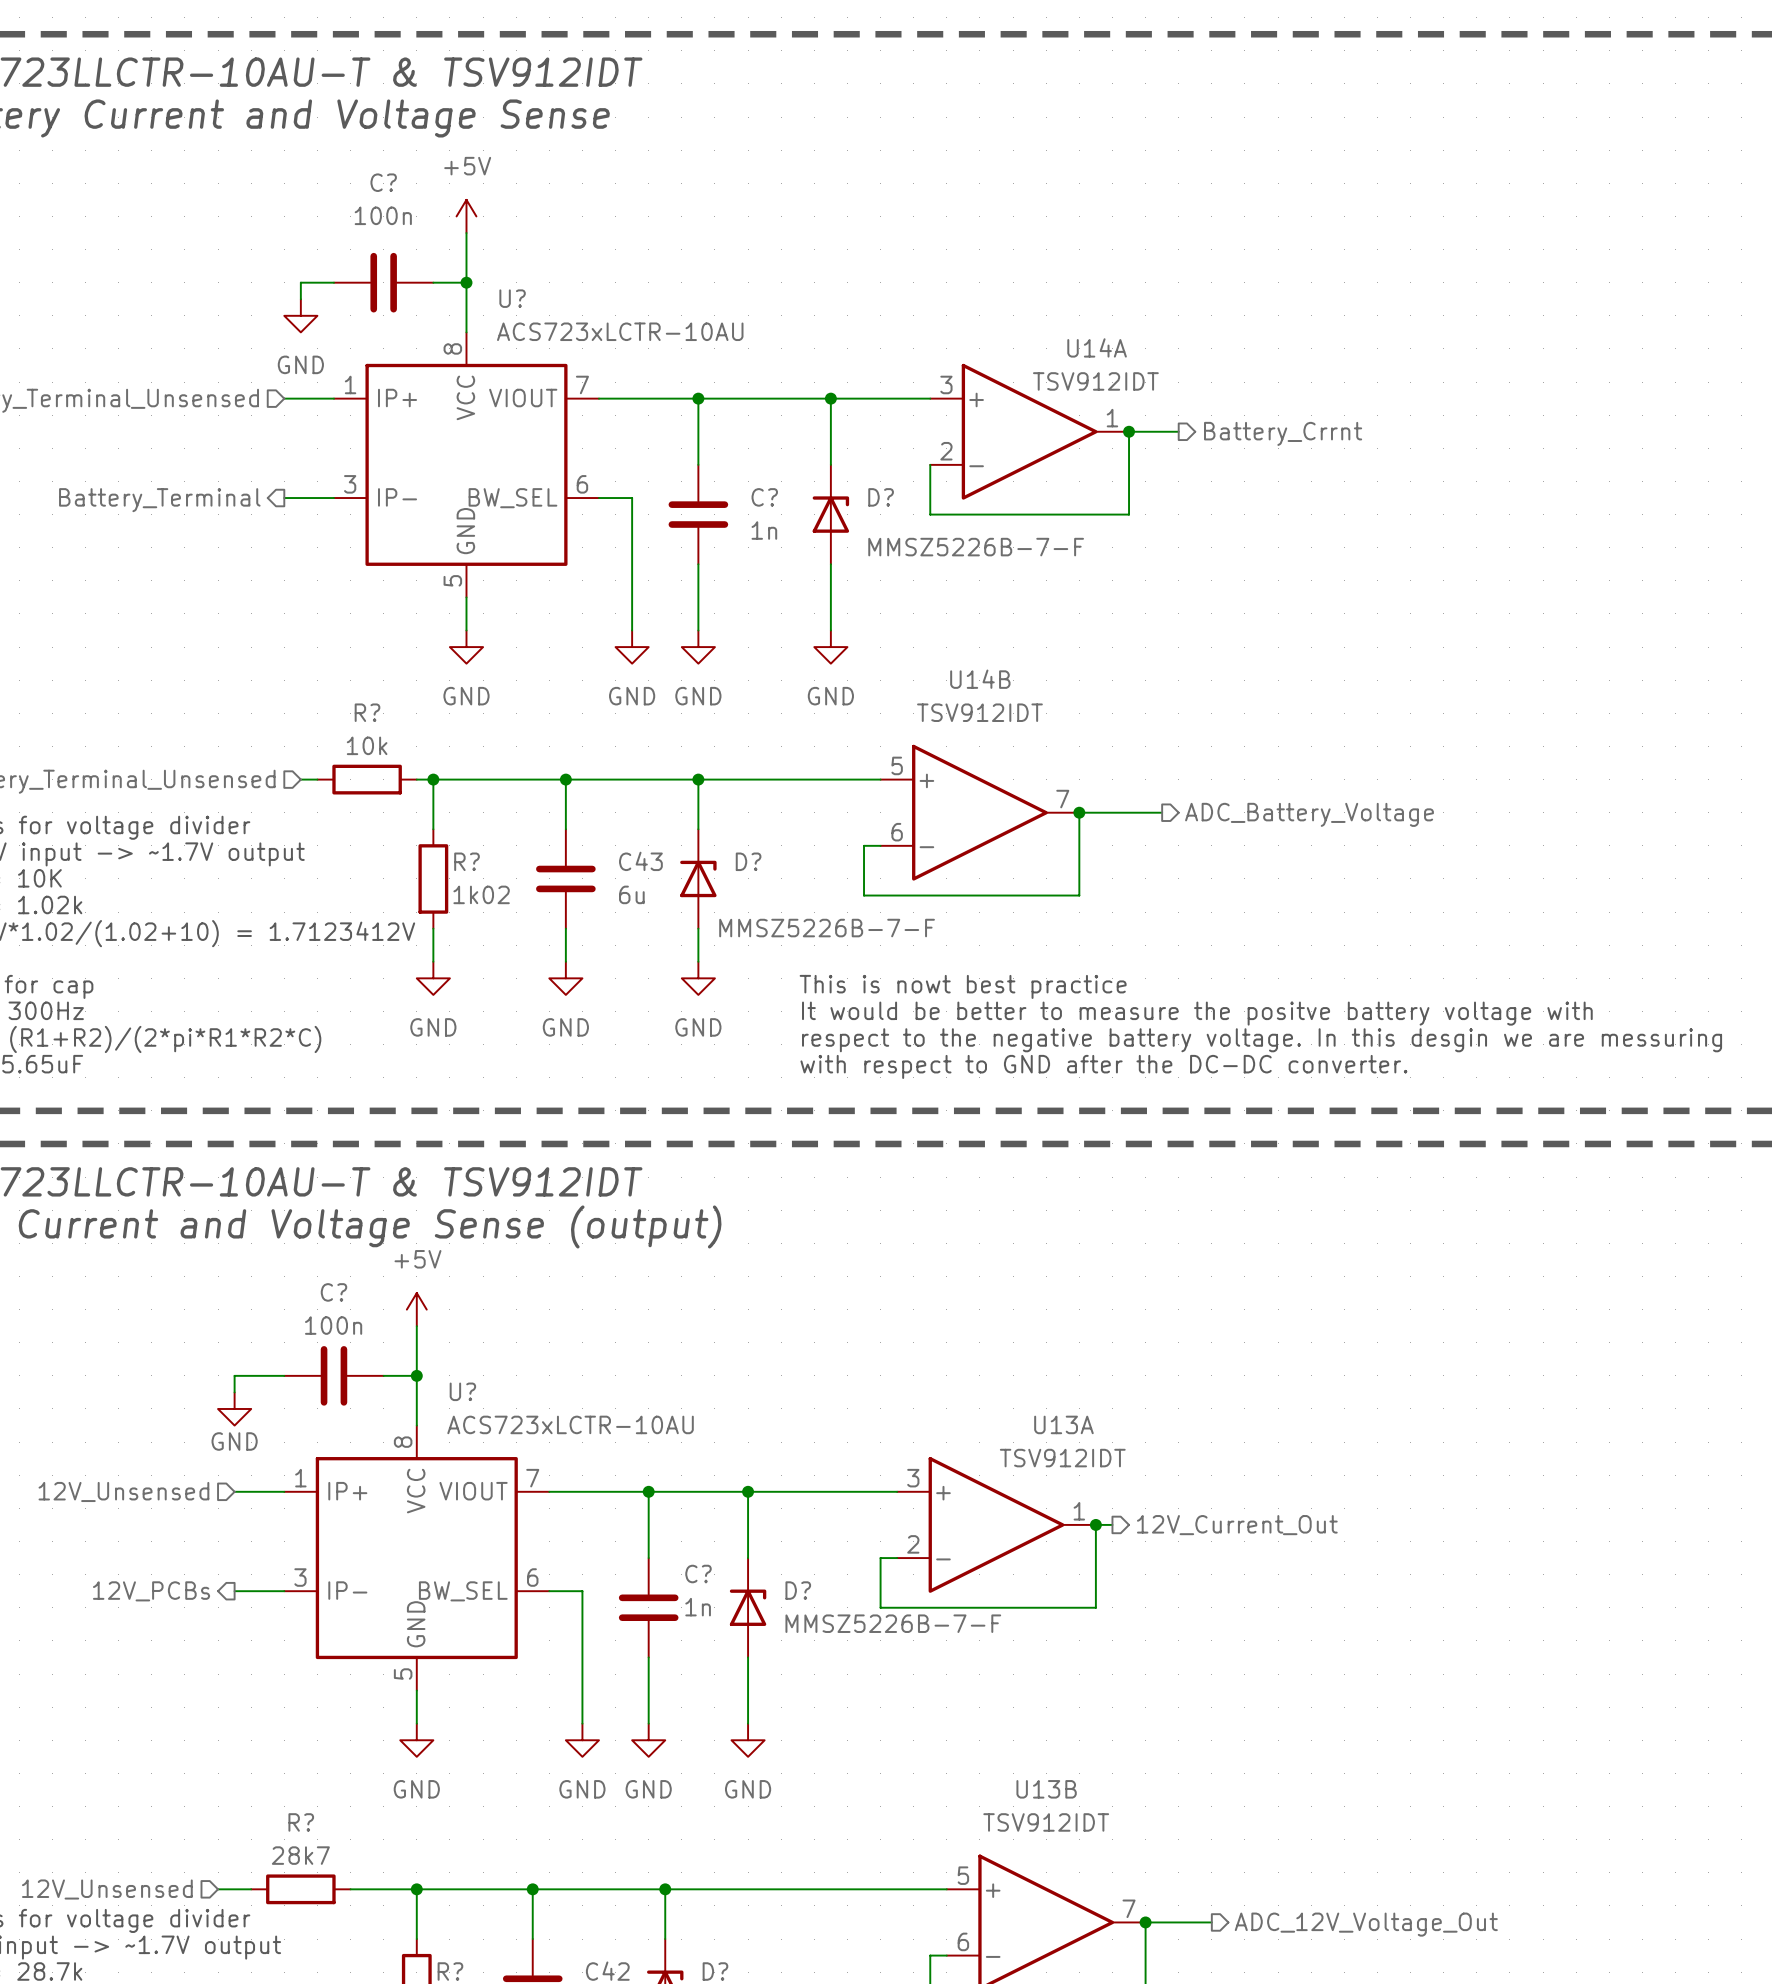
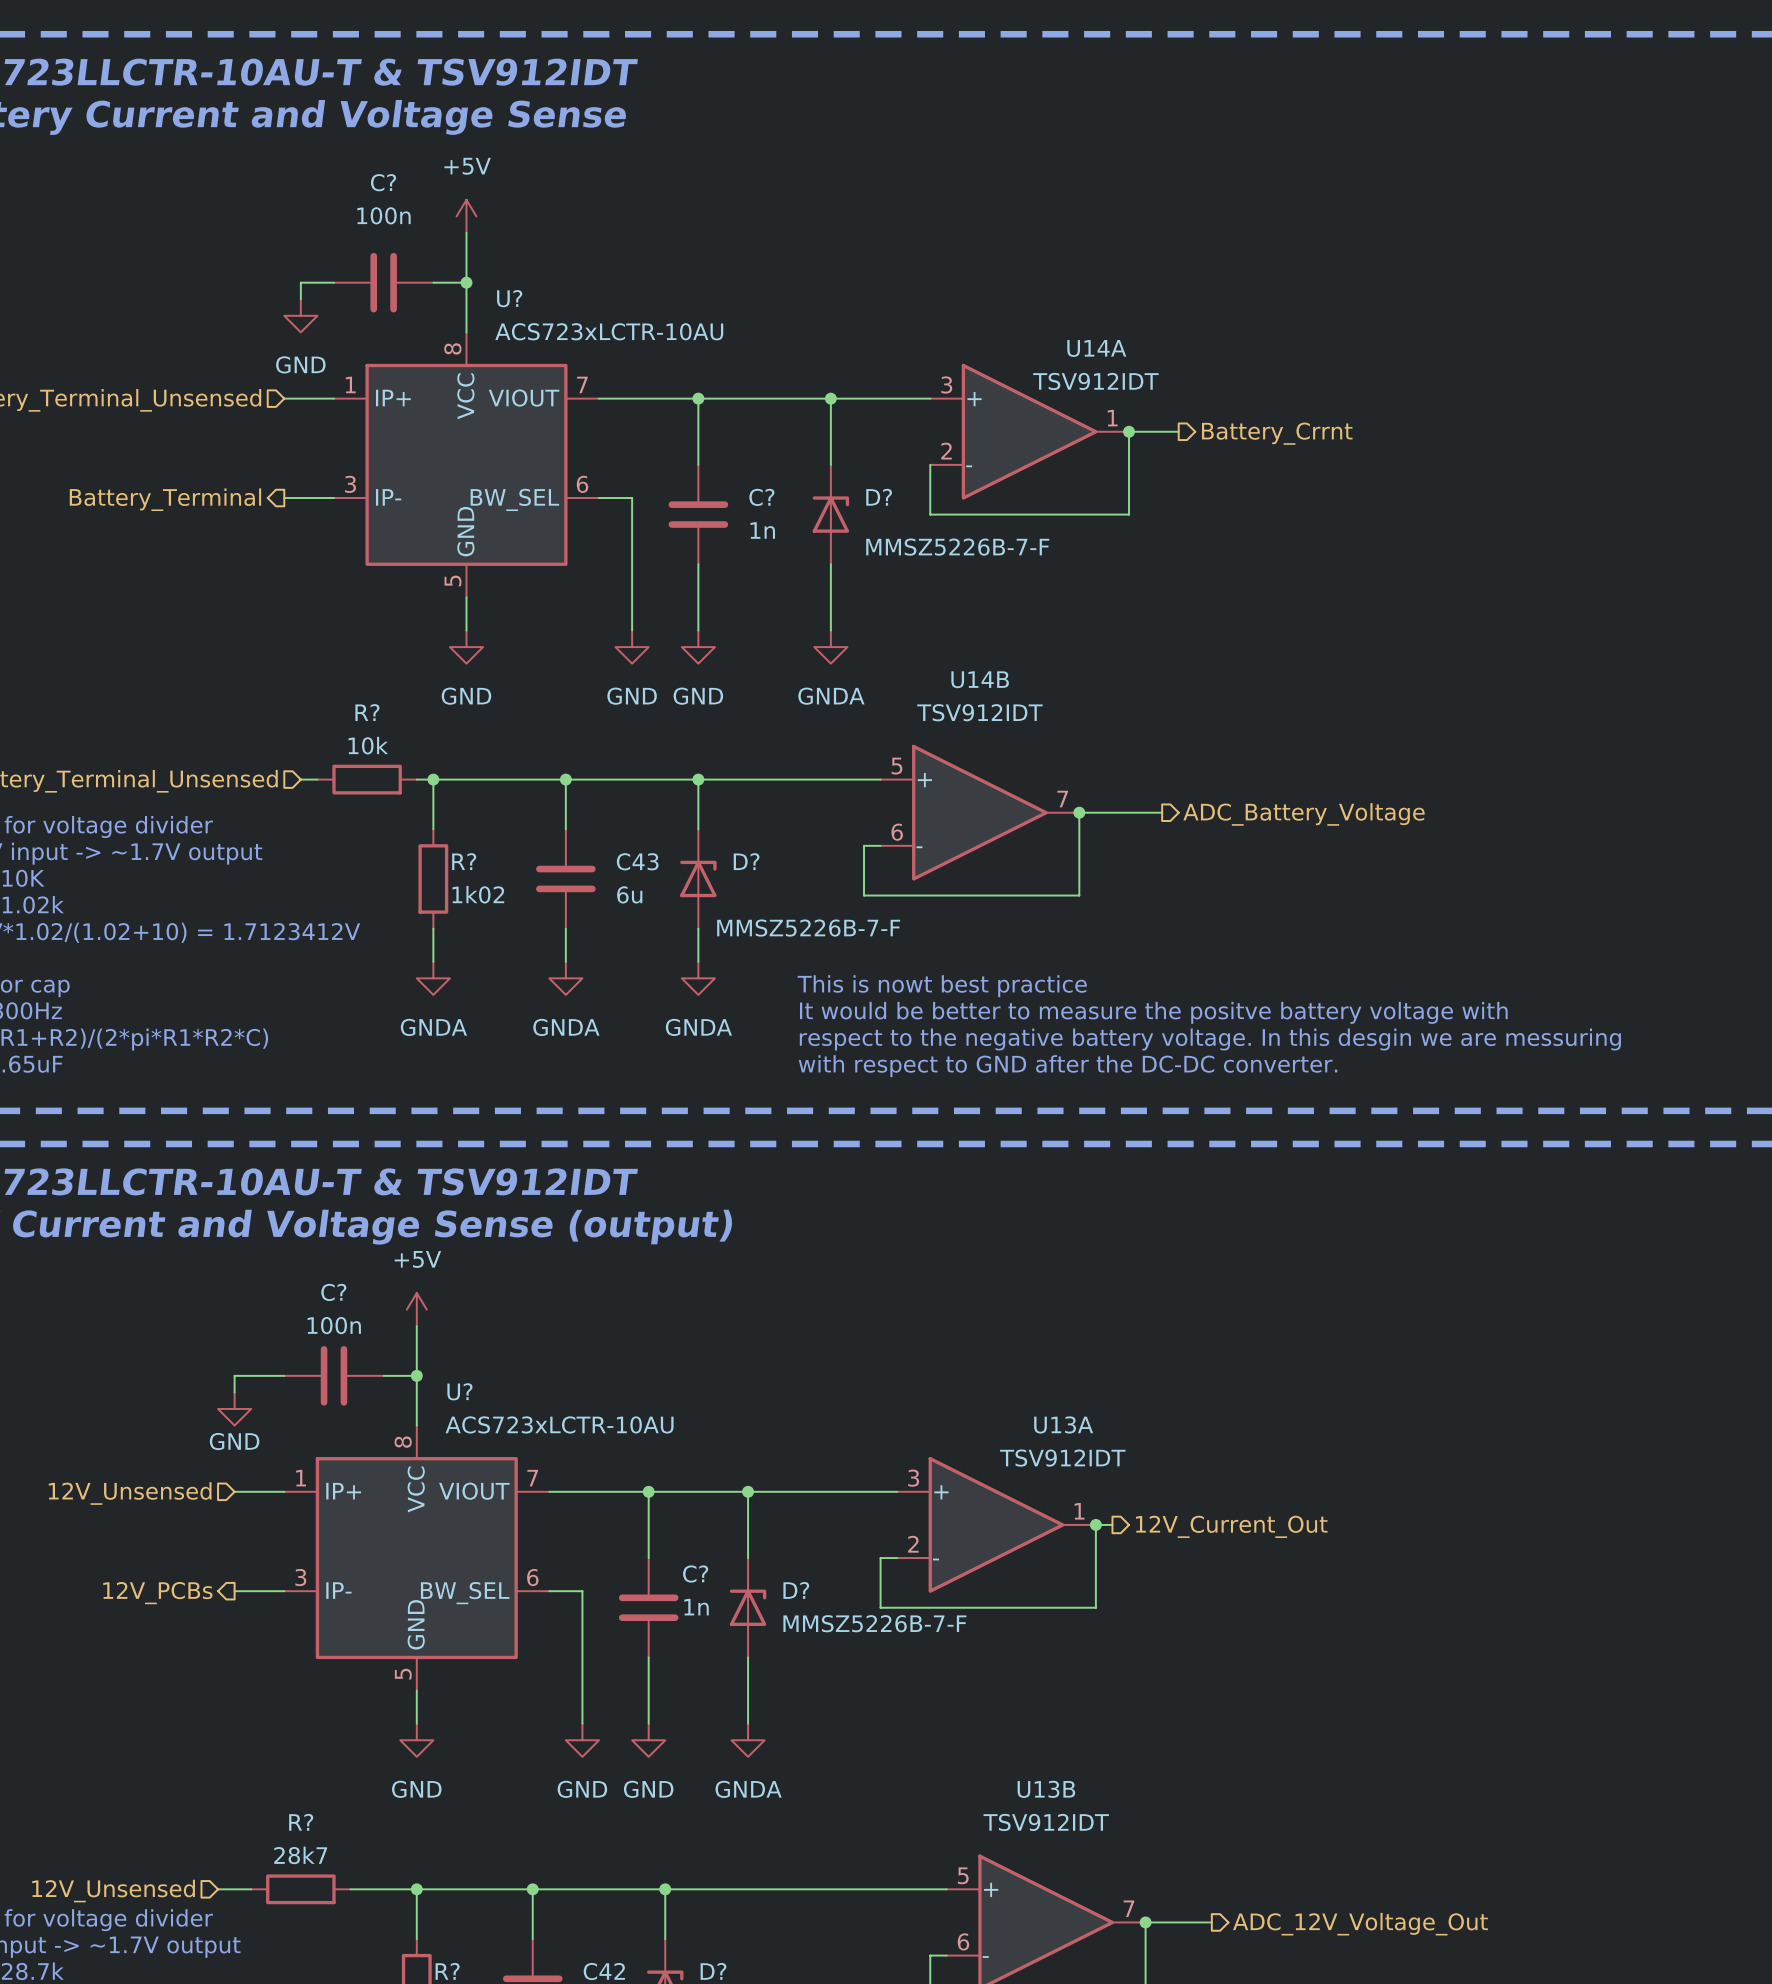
power symbol: GND (830, 647) -> GNDA (830, 647)
power symbol: GND (433, 978) -> GNDA (433, 978)
power symbol: GND (565, 978) -> GNDA (565, 978)
power symbol: GND (698, 978) -> GNDA (698, 978)
power symbol: GND (748, 1740) -> GNDA (748, 1740)

